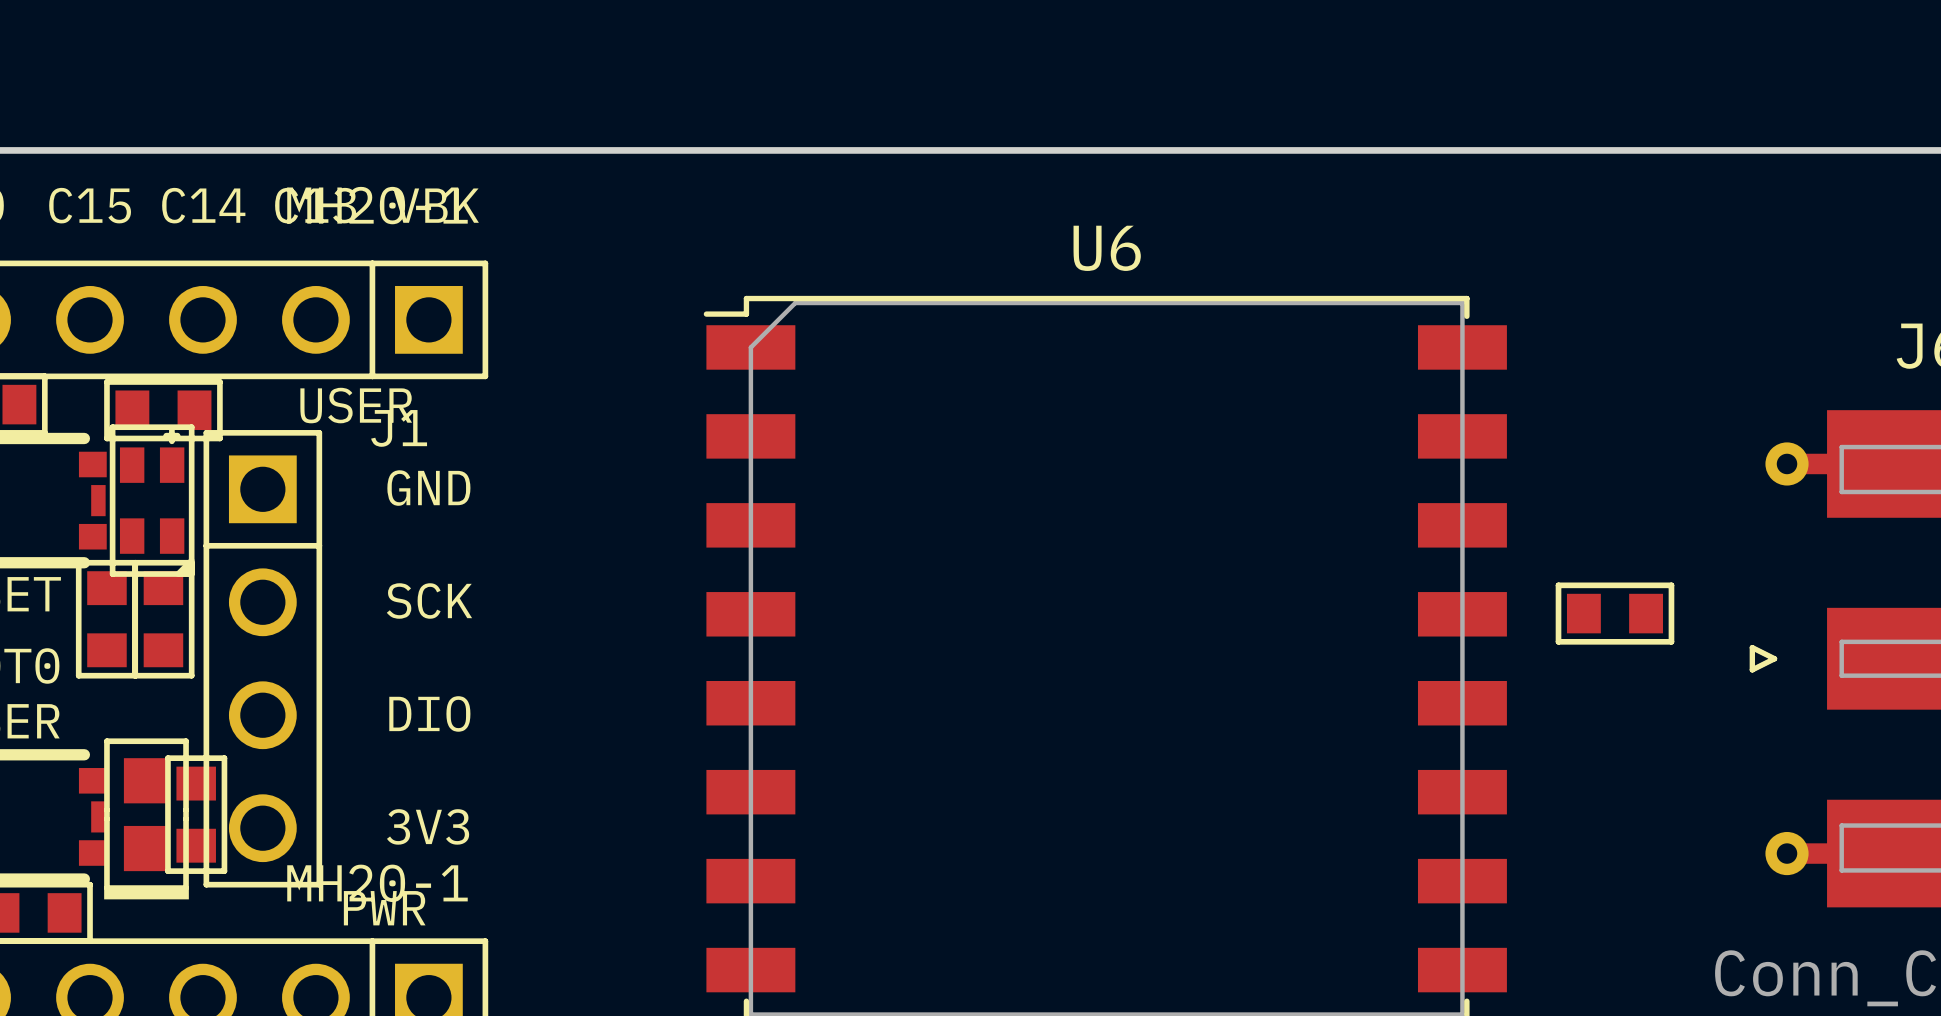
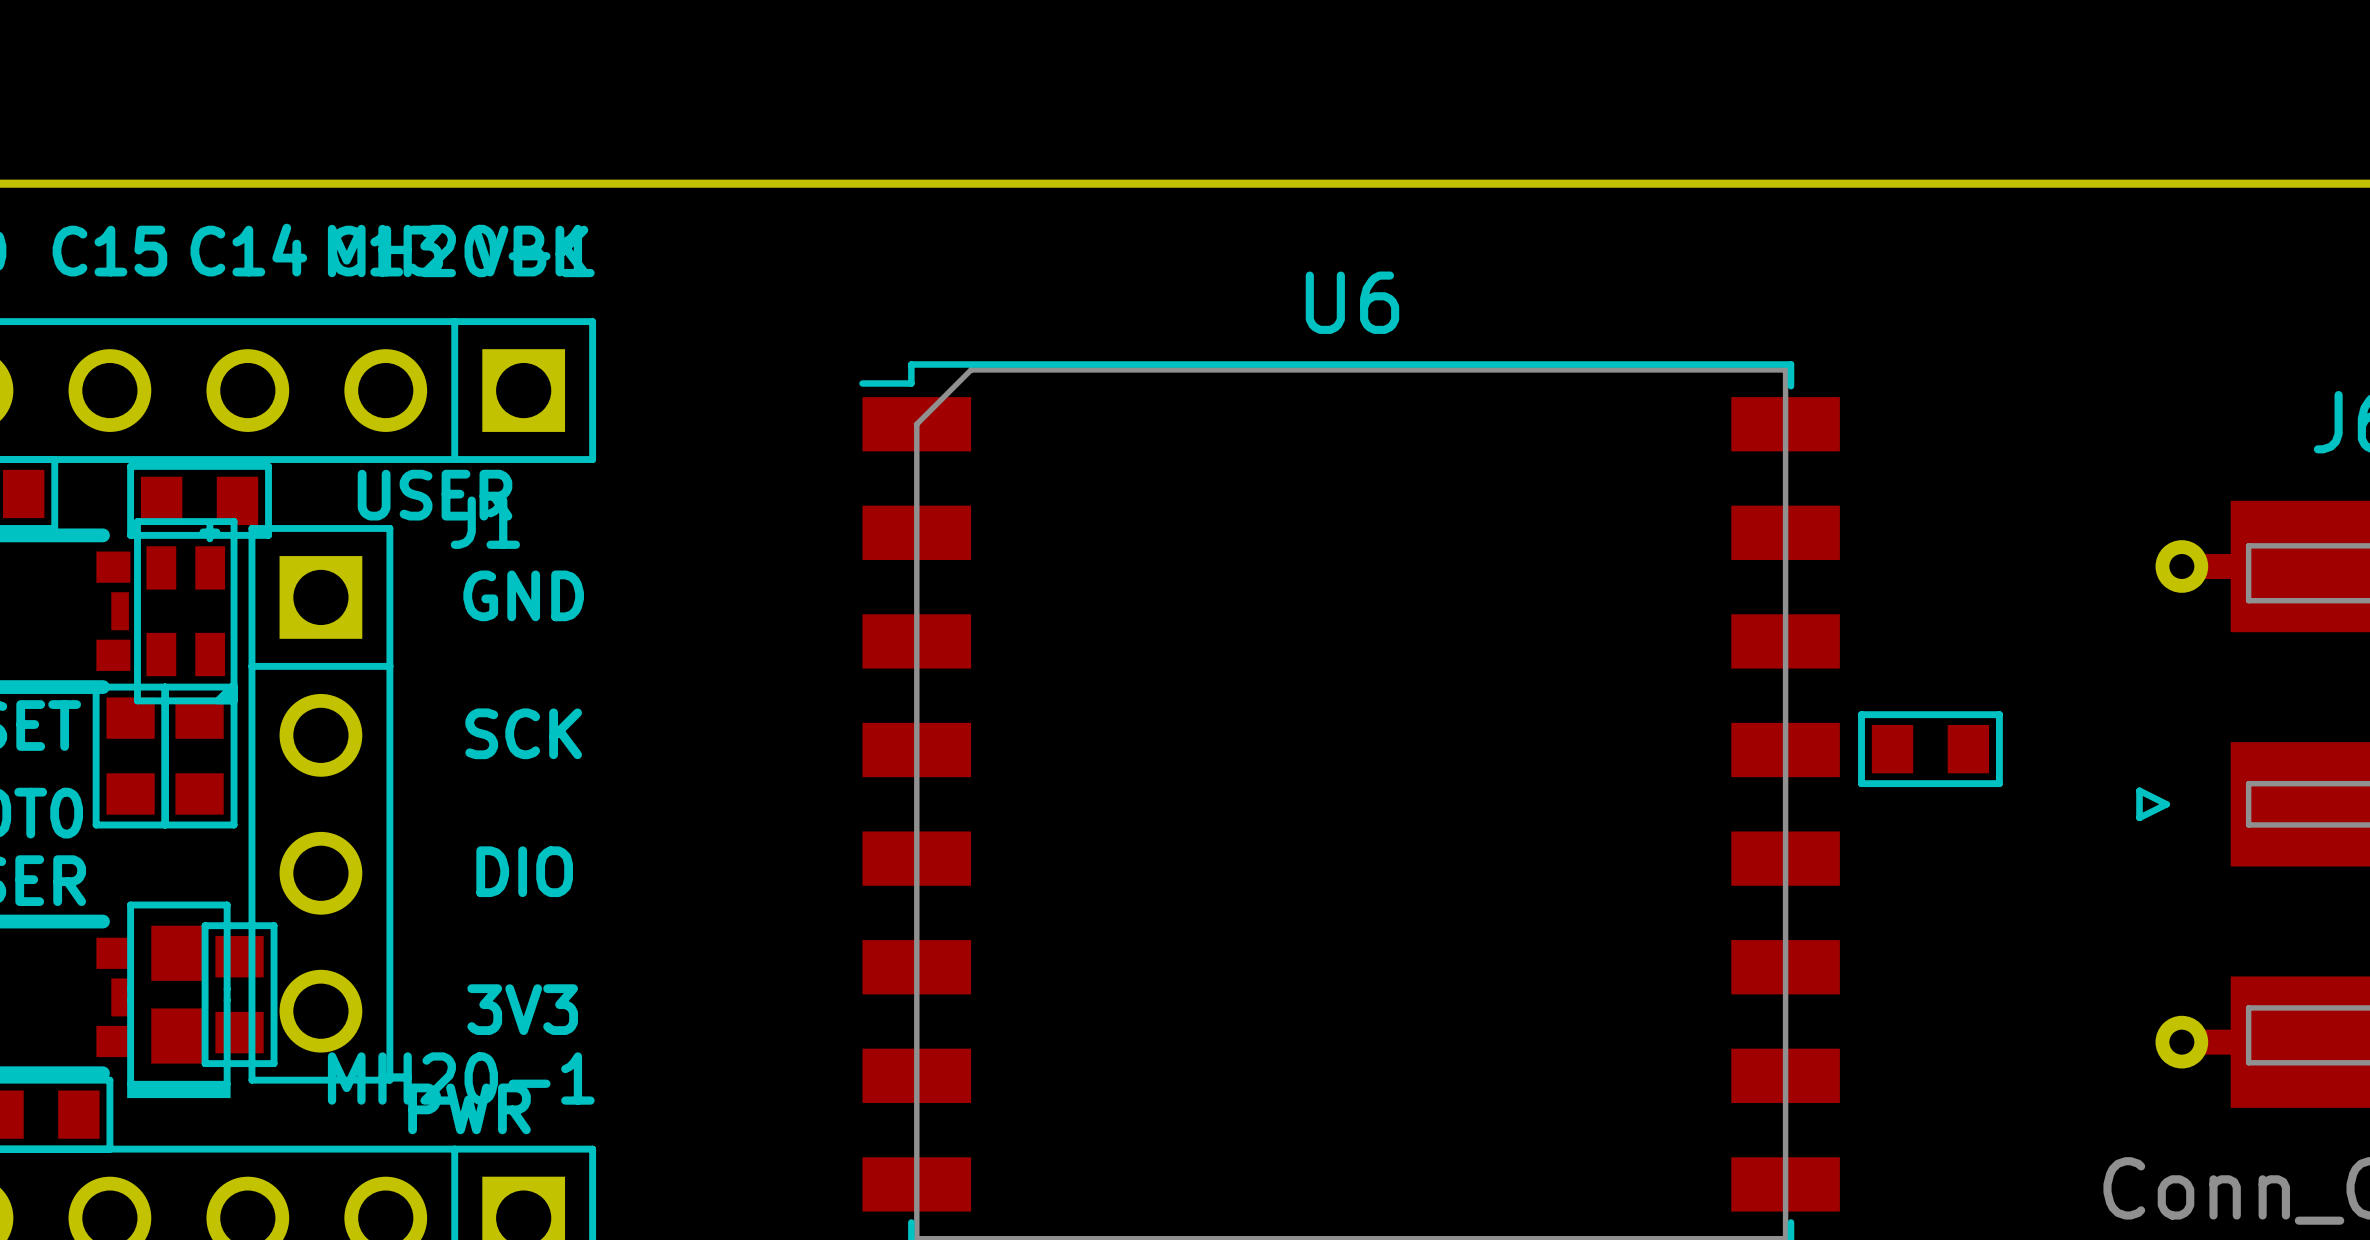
part position: (1614, 613) -> (1930, 749)

